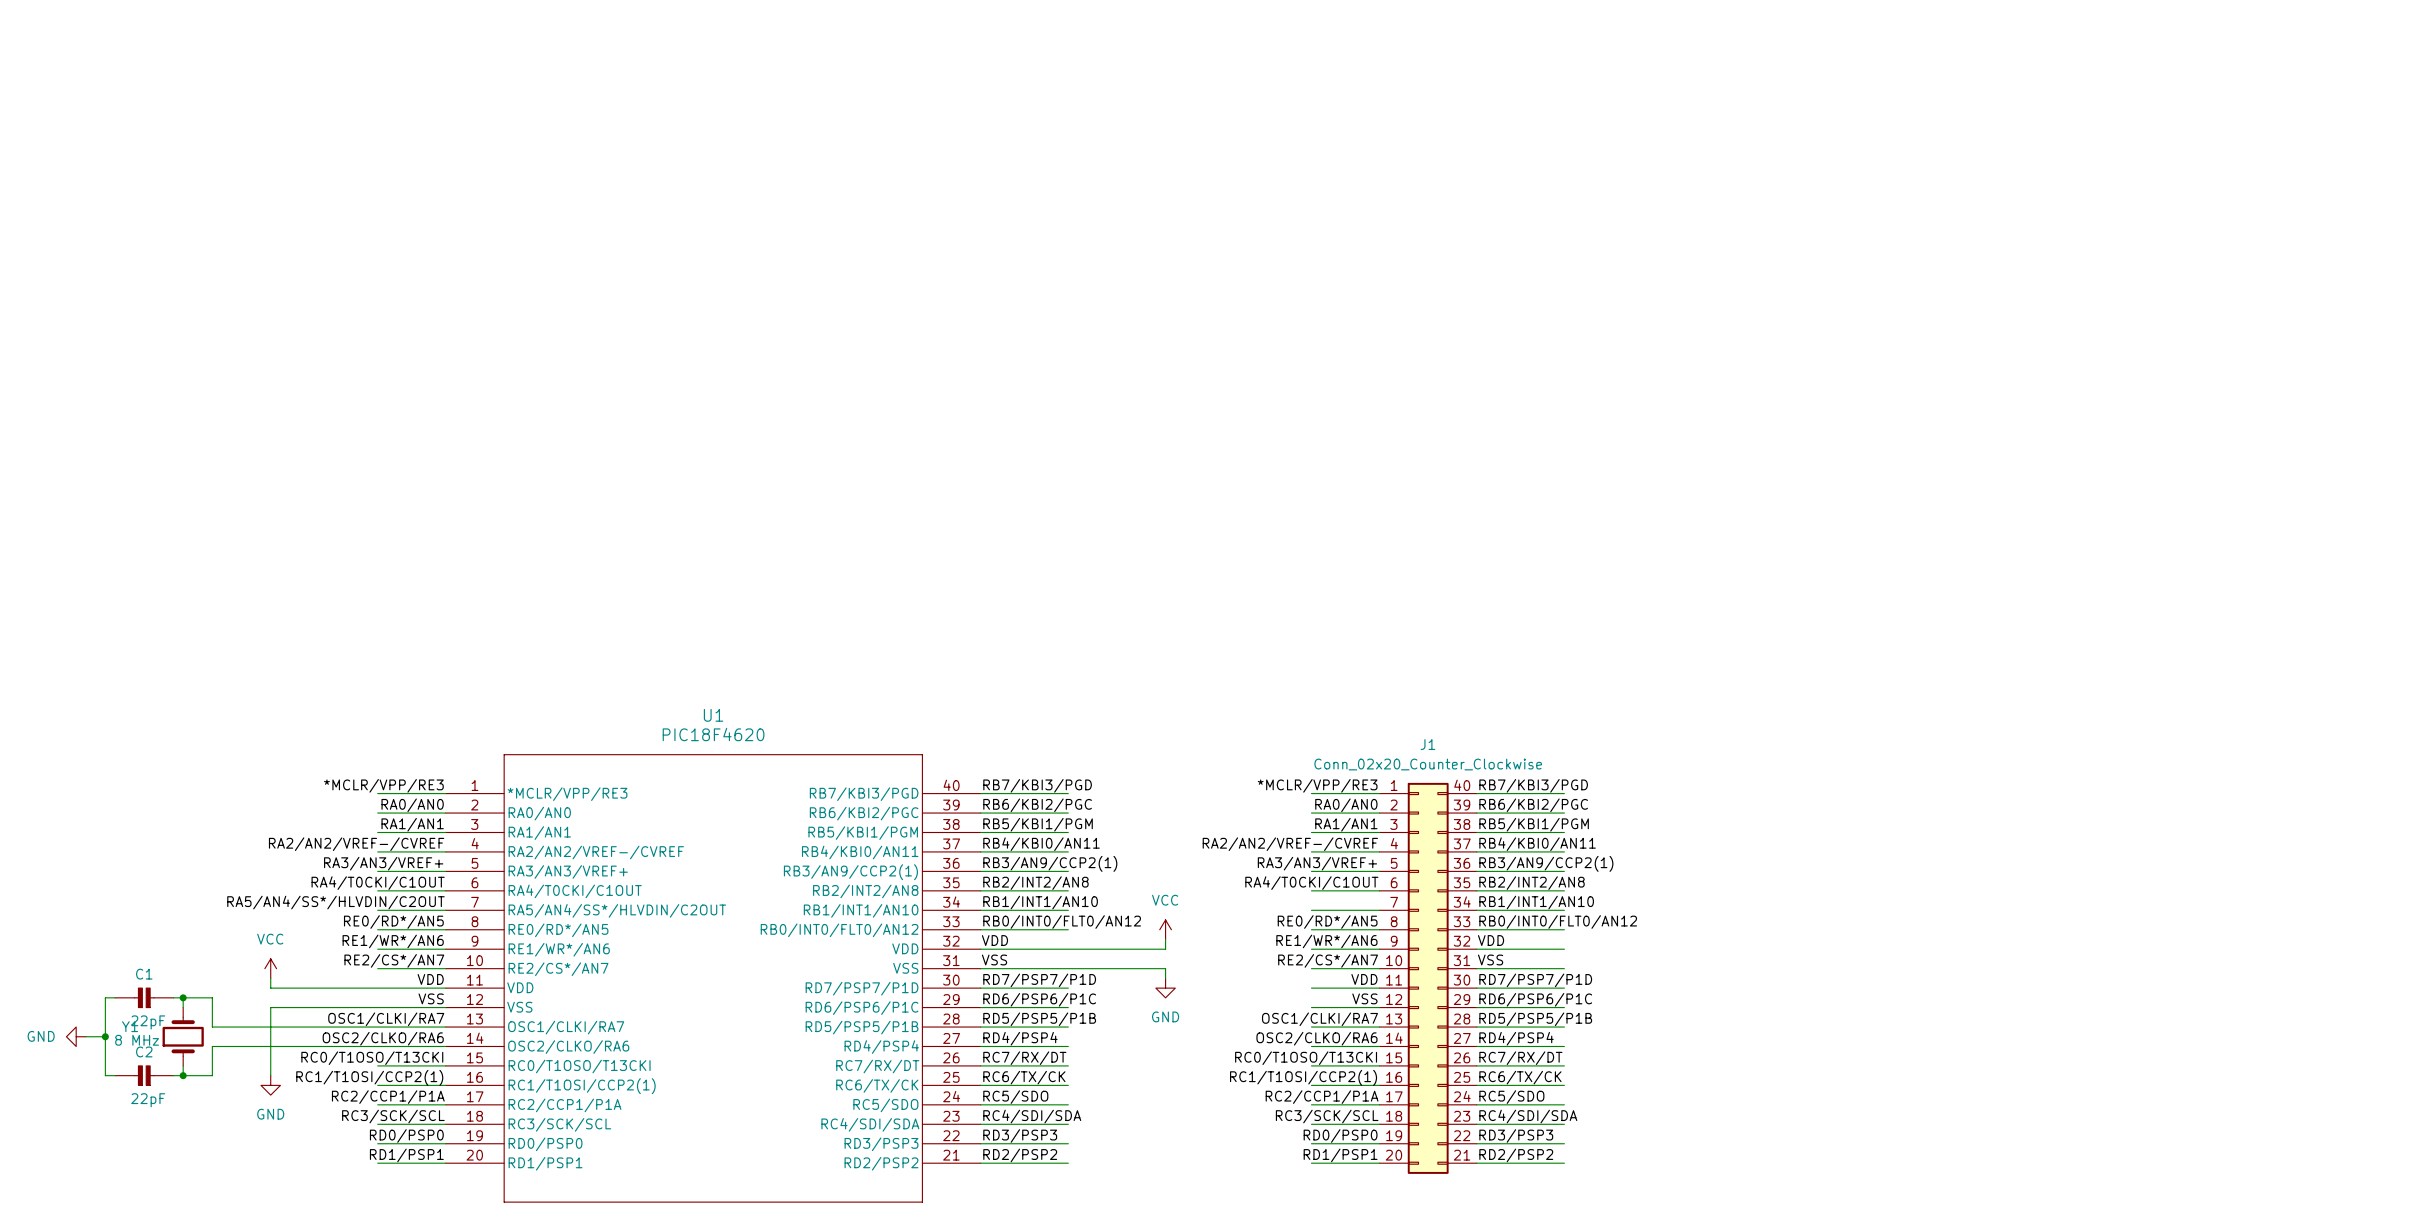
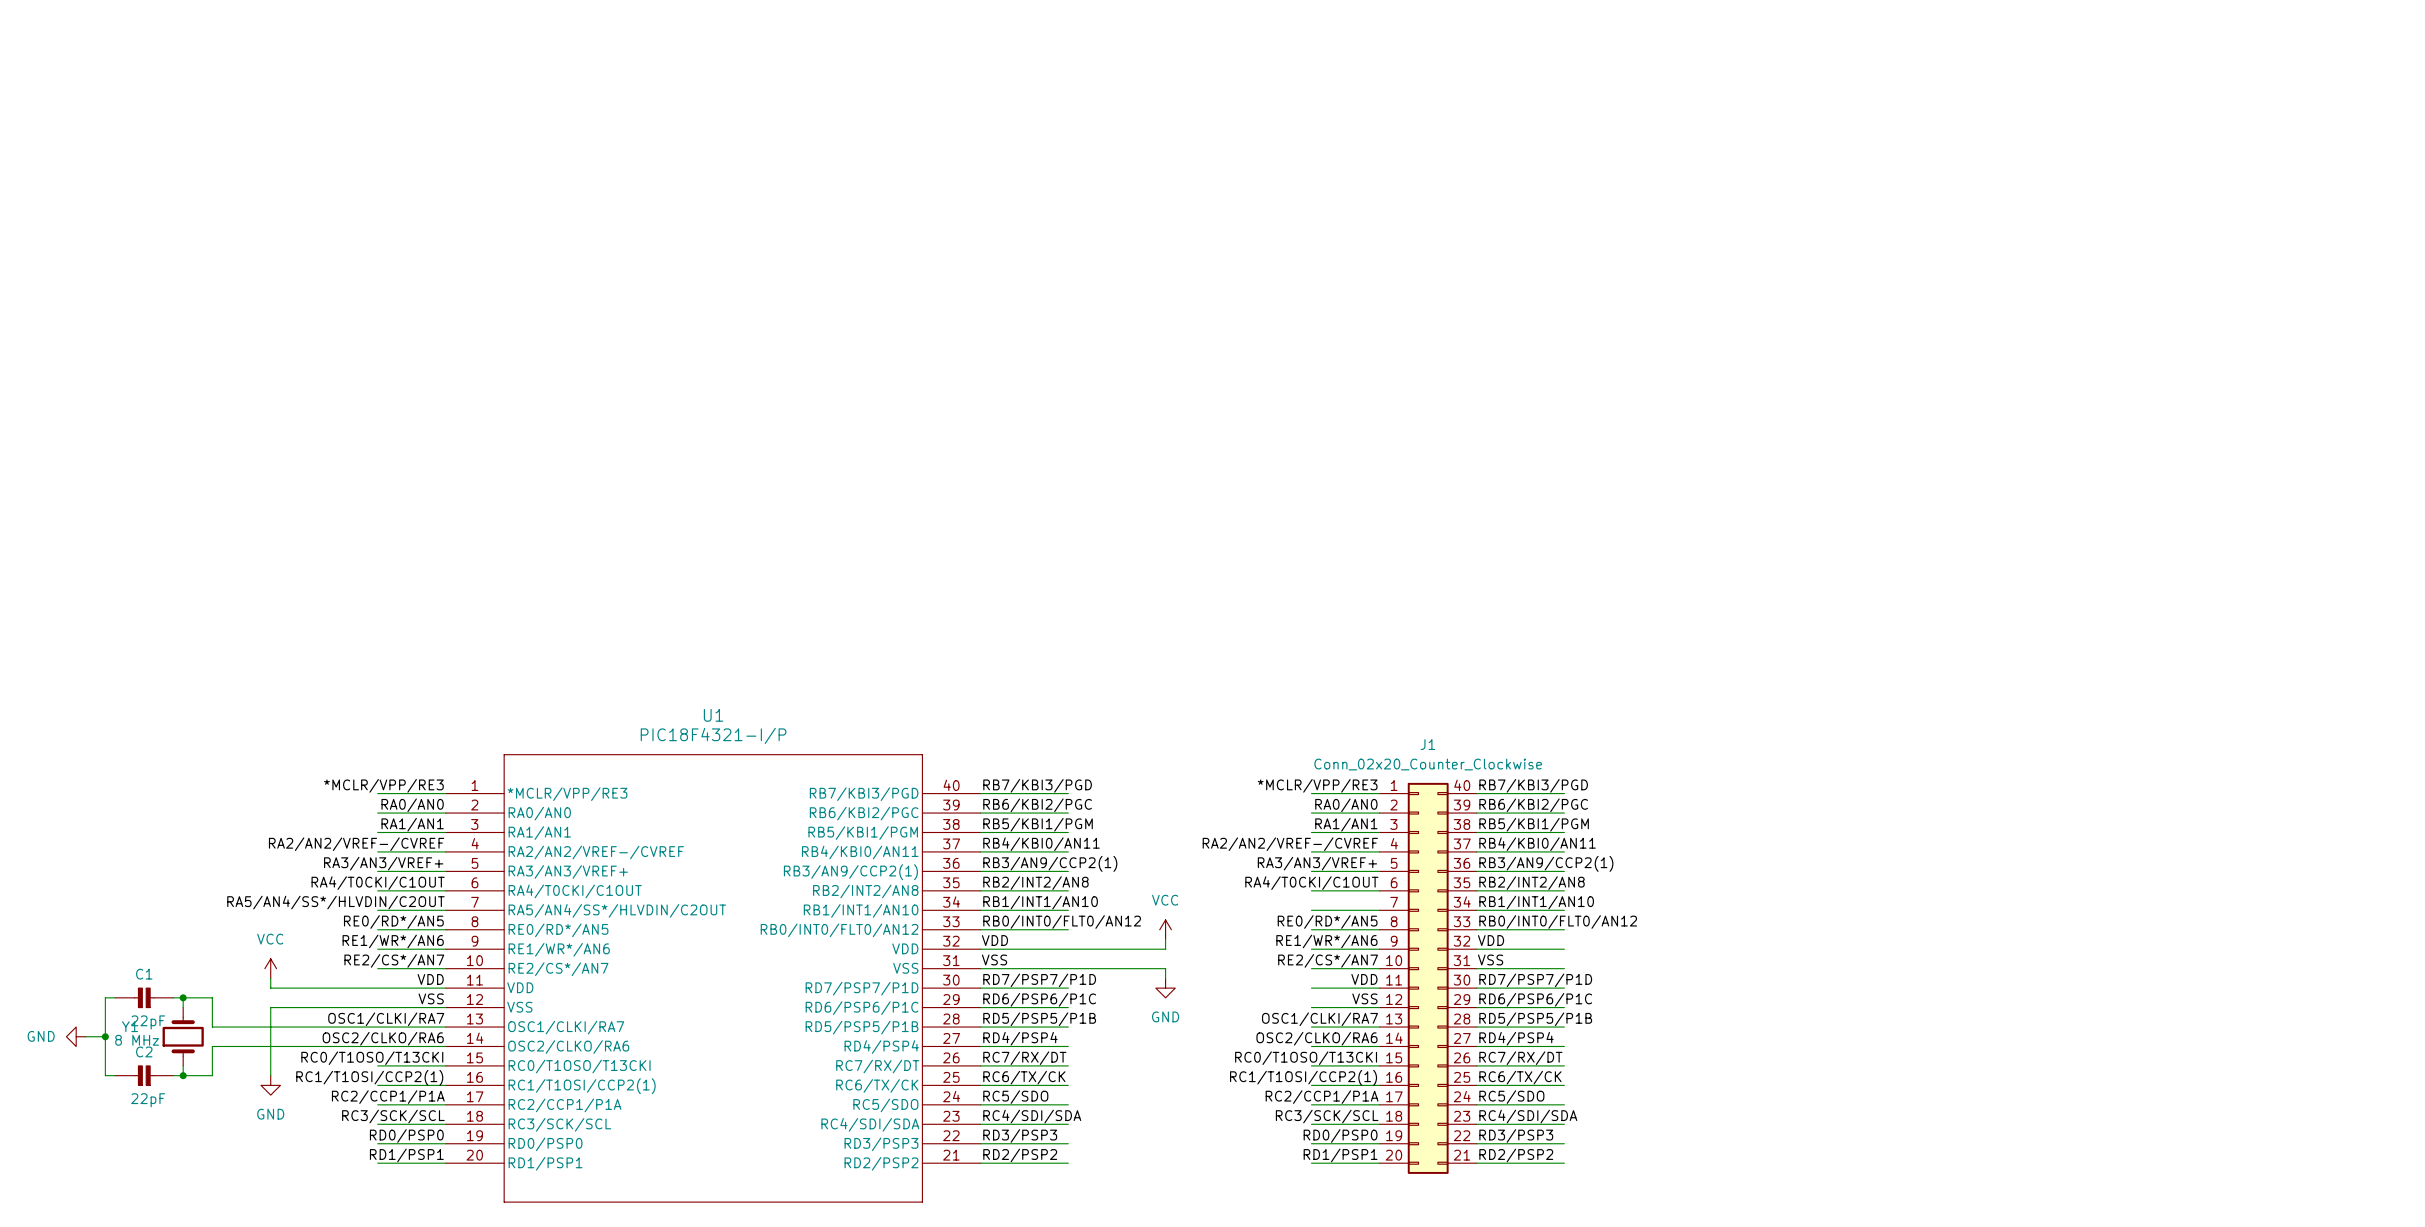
U1 value: PIC18F4620 (713, 734) -> PIC18F4321-I/P (713, 735)

